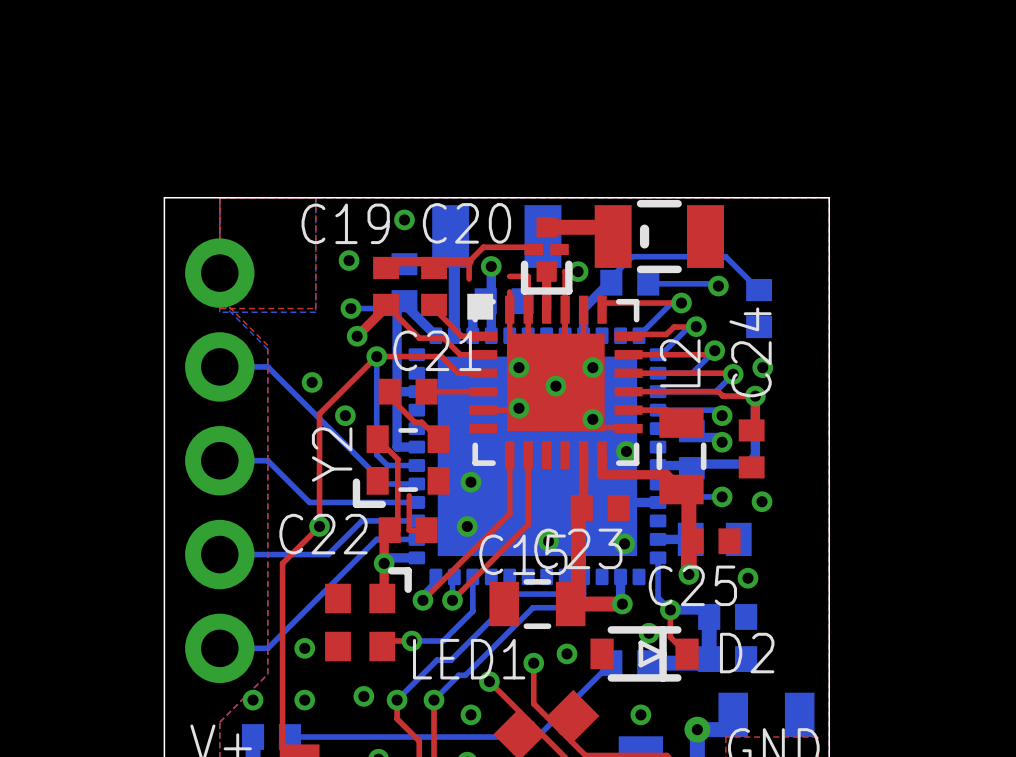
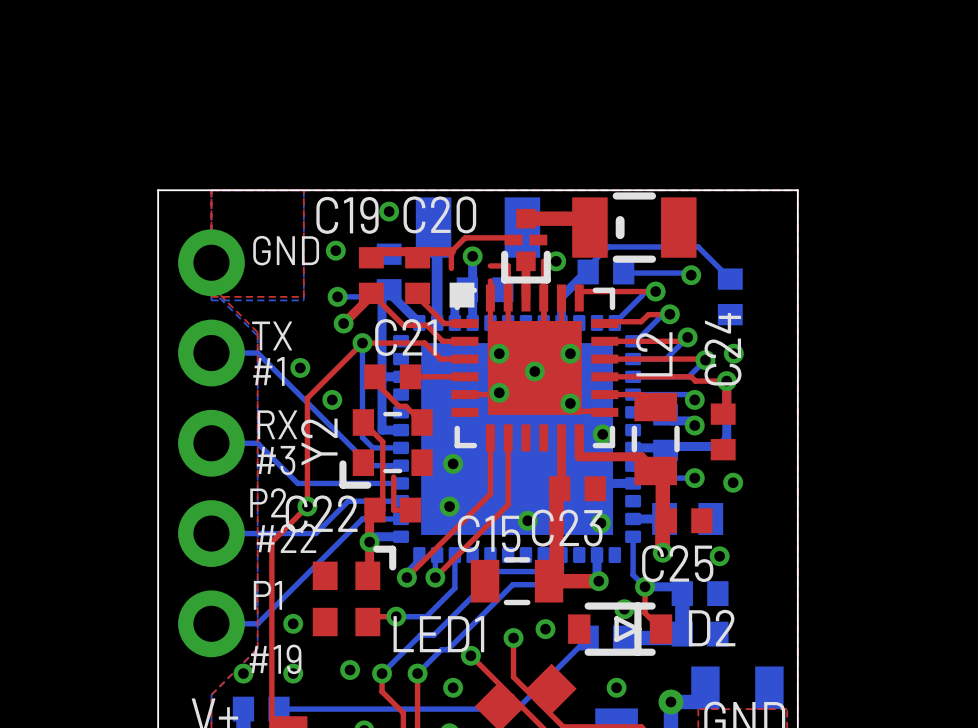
text: none -> GND (286, 250)
text: none -> TX (272, 335)
text: none -> #1 (268, 371)
text: none -> RX (277, 424)
text: none -> #3 (276, 460)
text: none -> P2 (268, 502)
text: none -> #22 (286, 538)
text: none -> P1 (267, 595)
text: none -> #19 (275, 659)

